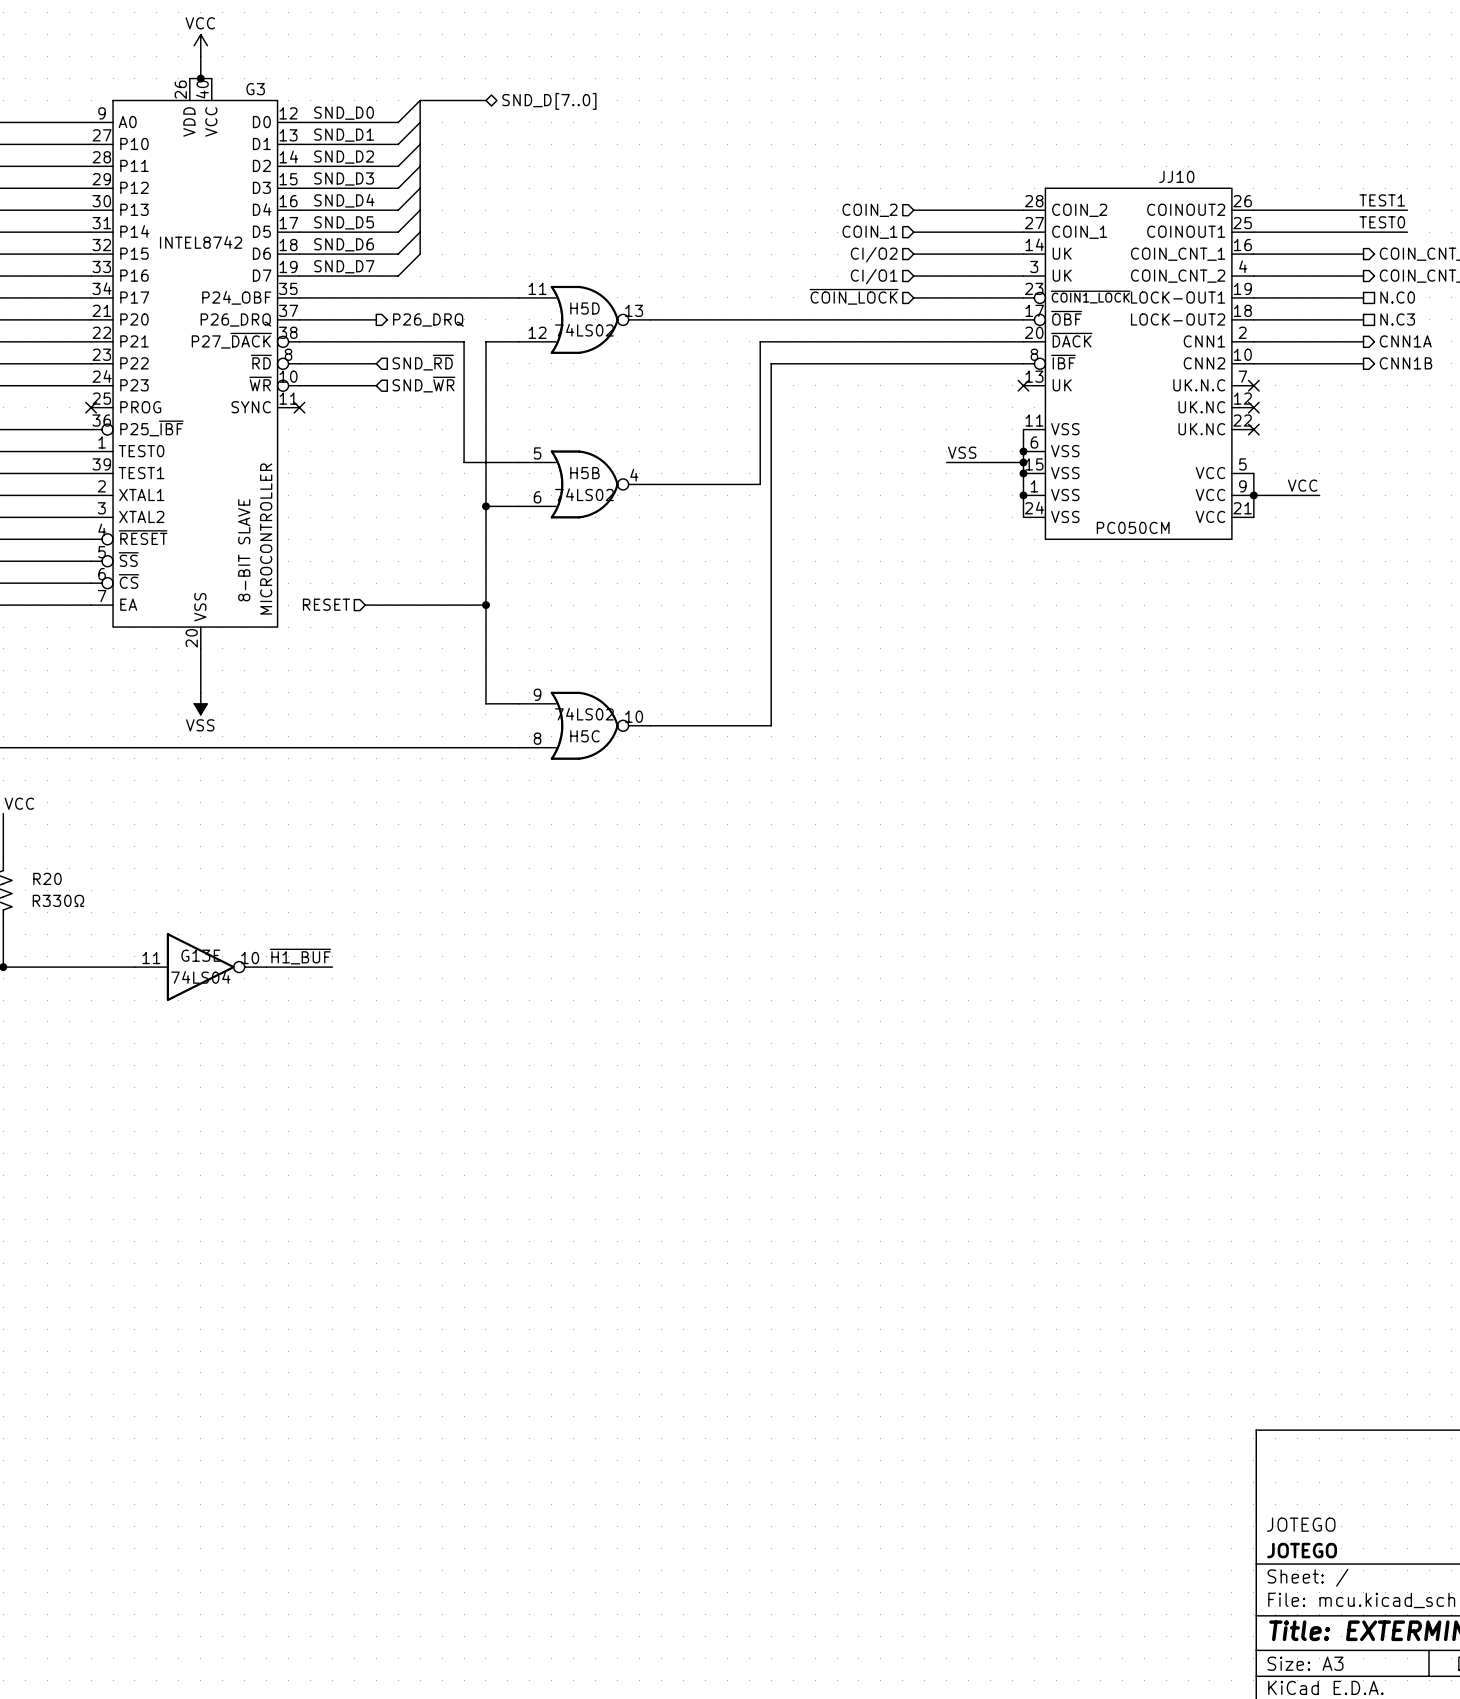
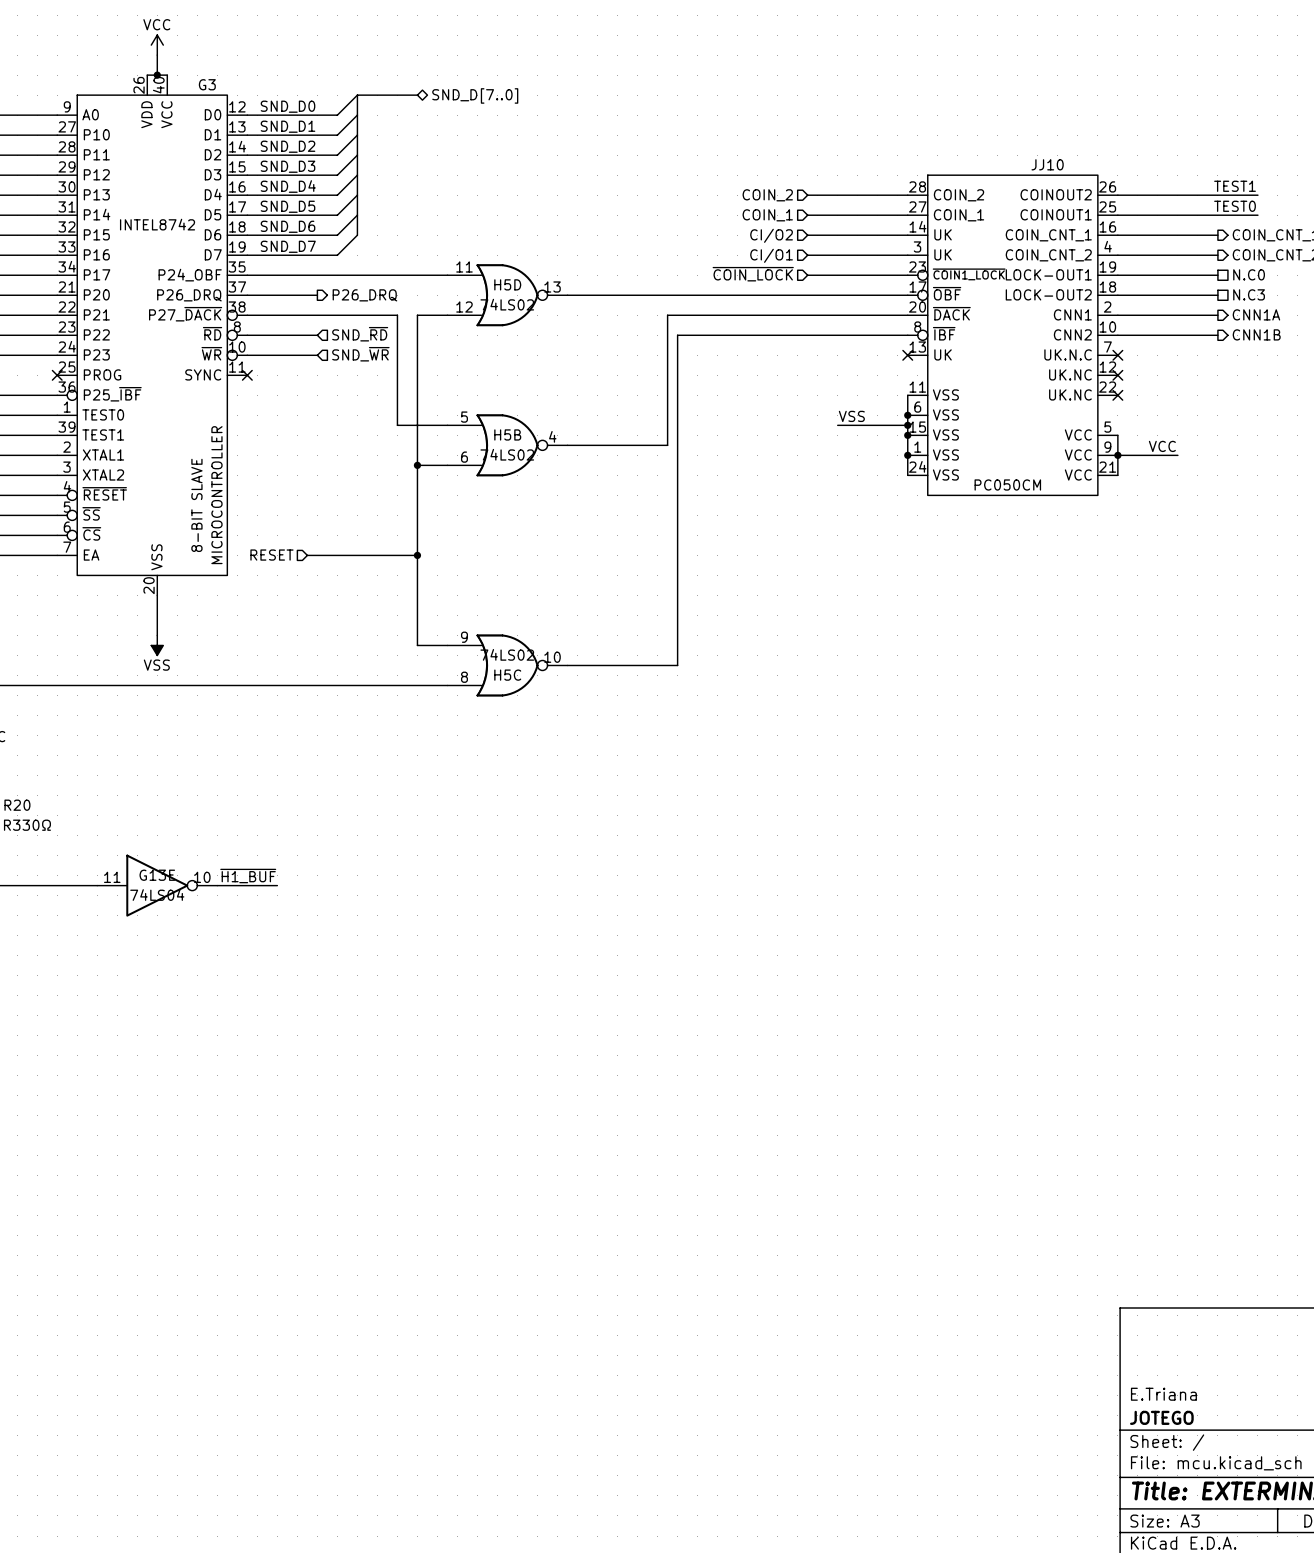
title block: JOTEGO (1301, 1524) -> E.Triana (1163, 1394)

